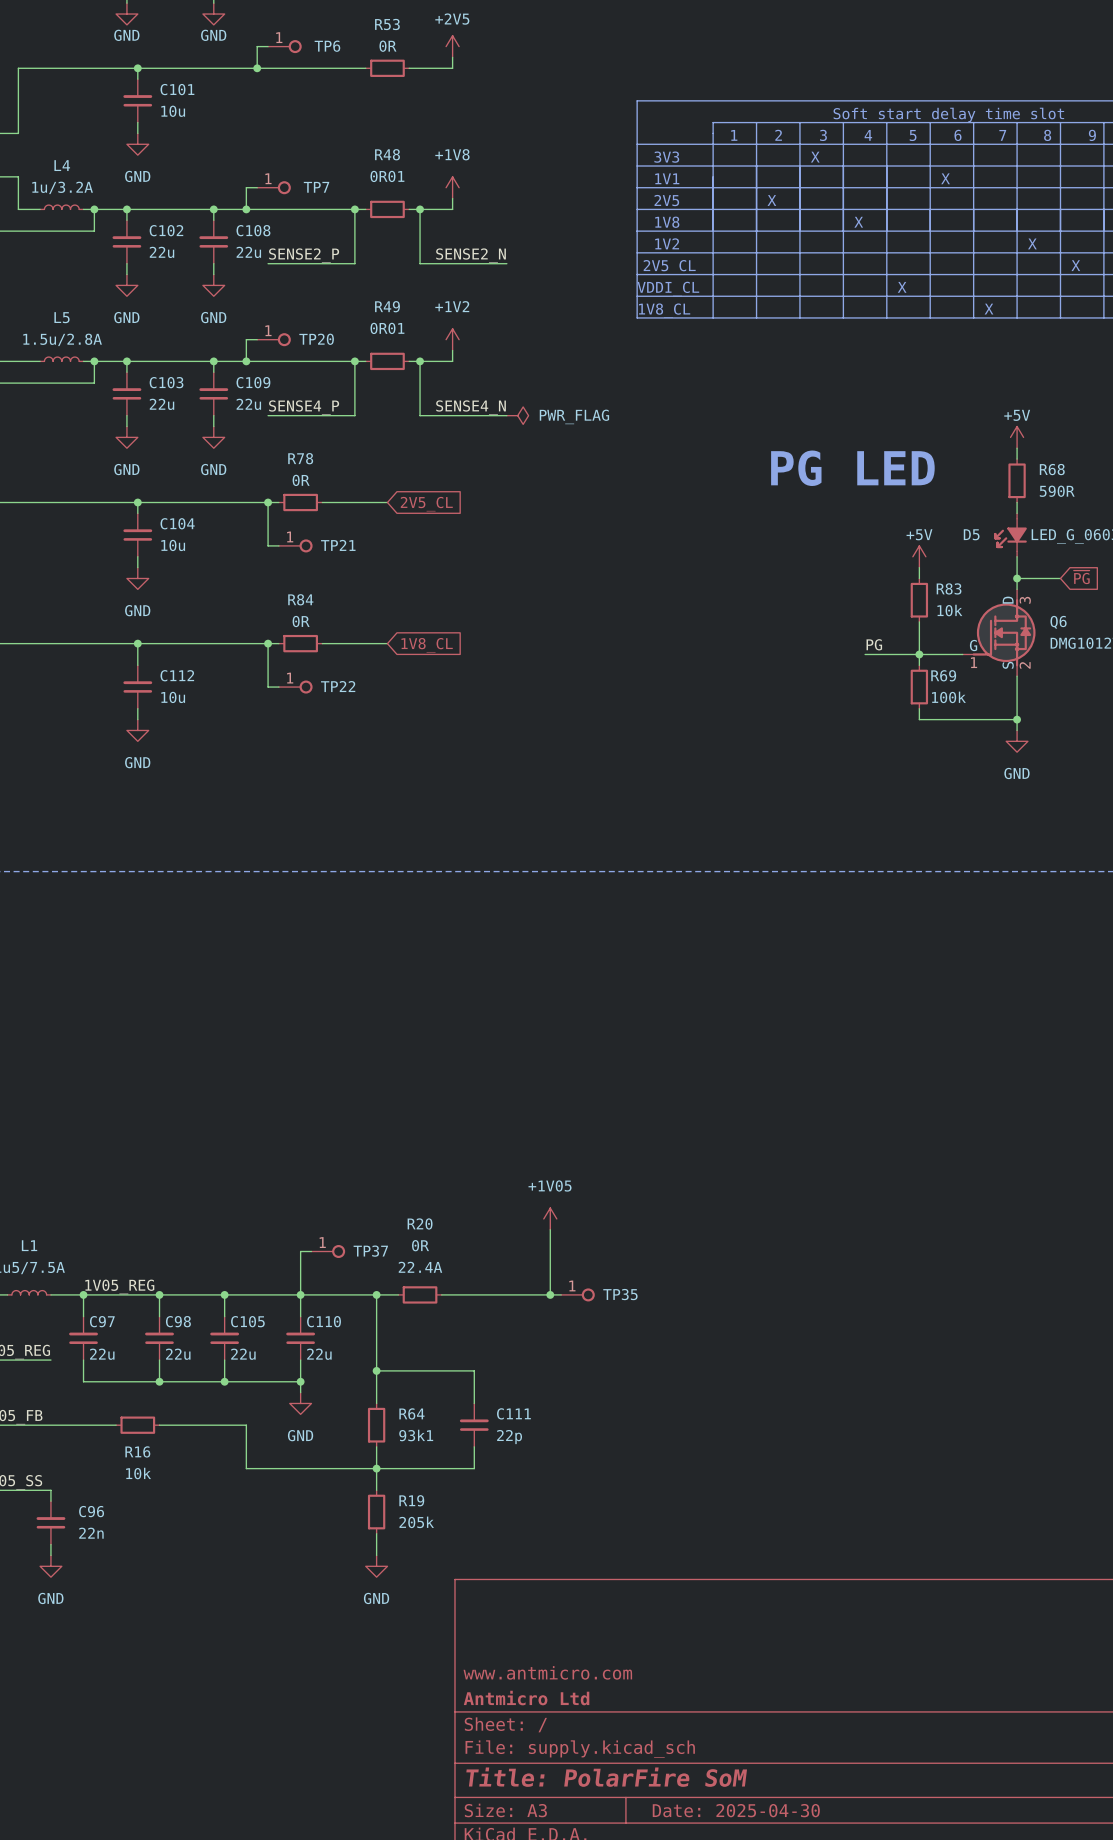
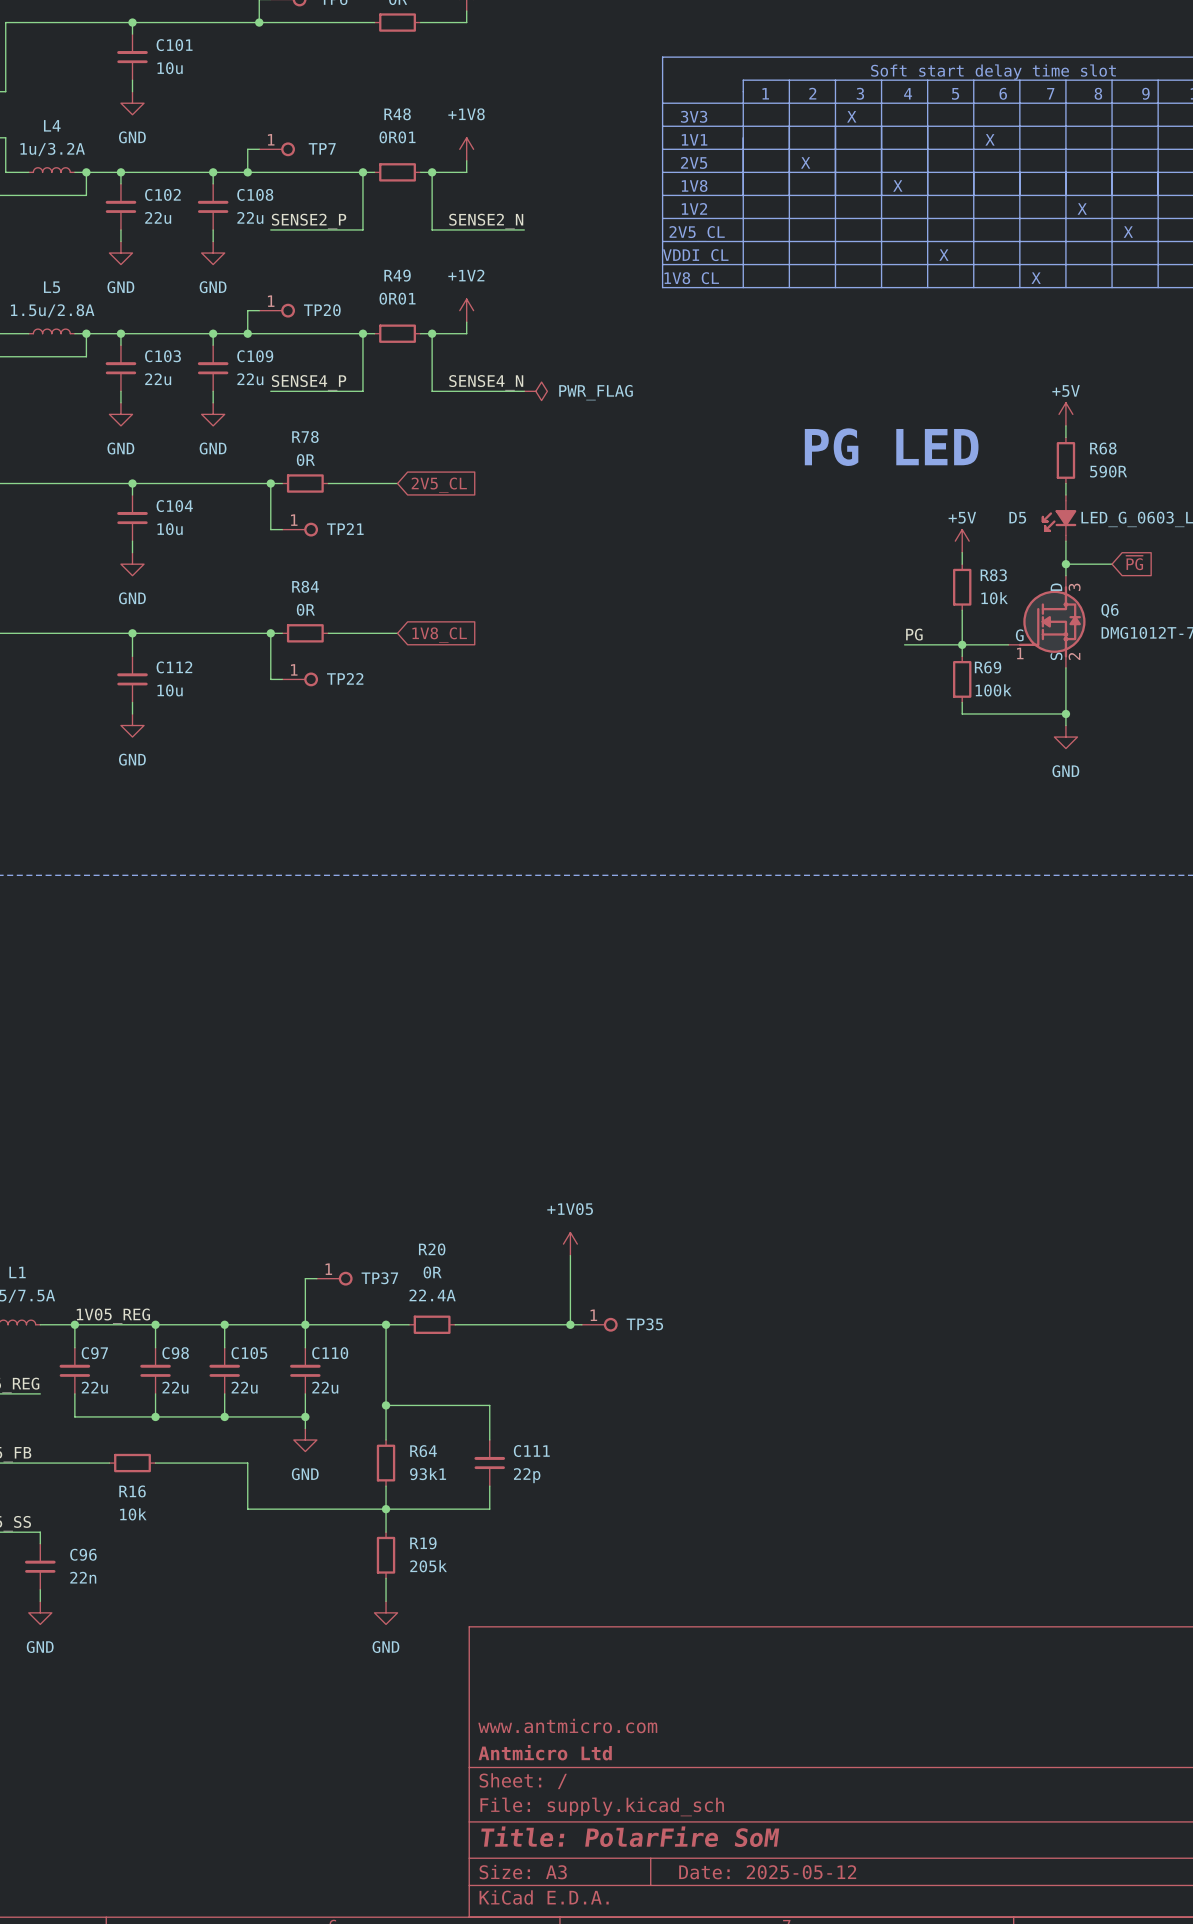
title block: Date: 2025-04-30 (736, 1810) -> Date: 2025-05-12 (767, 1872)

